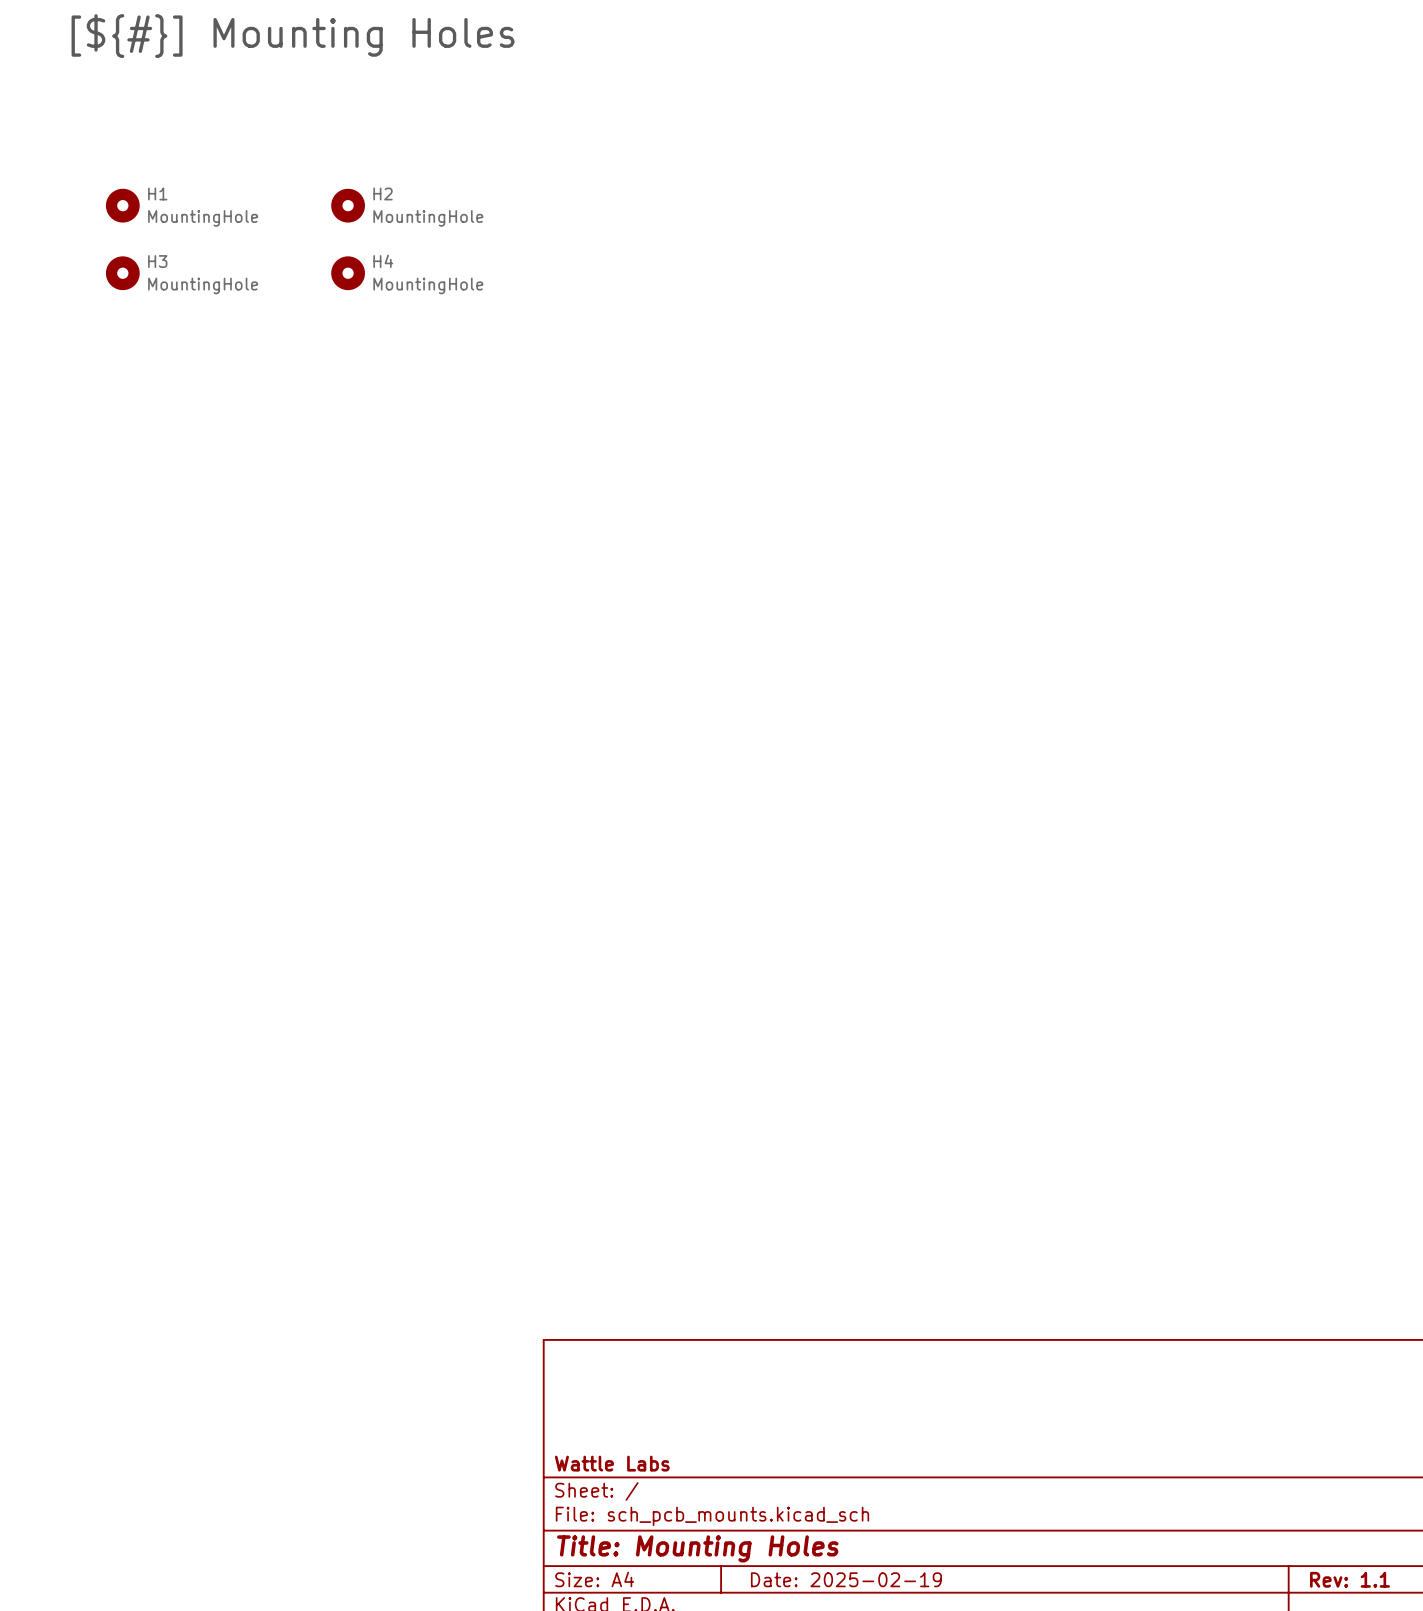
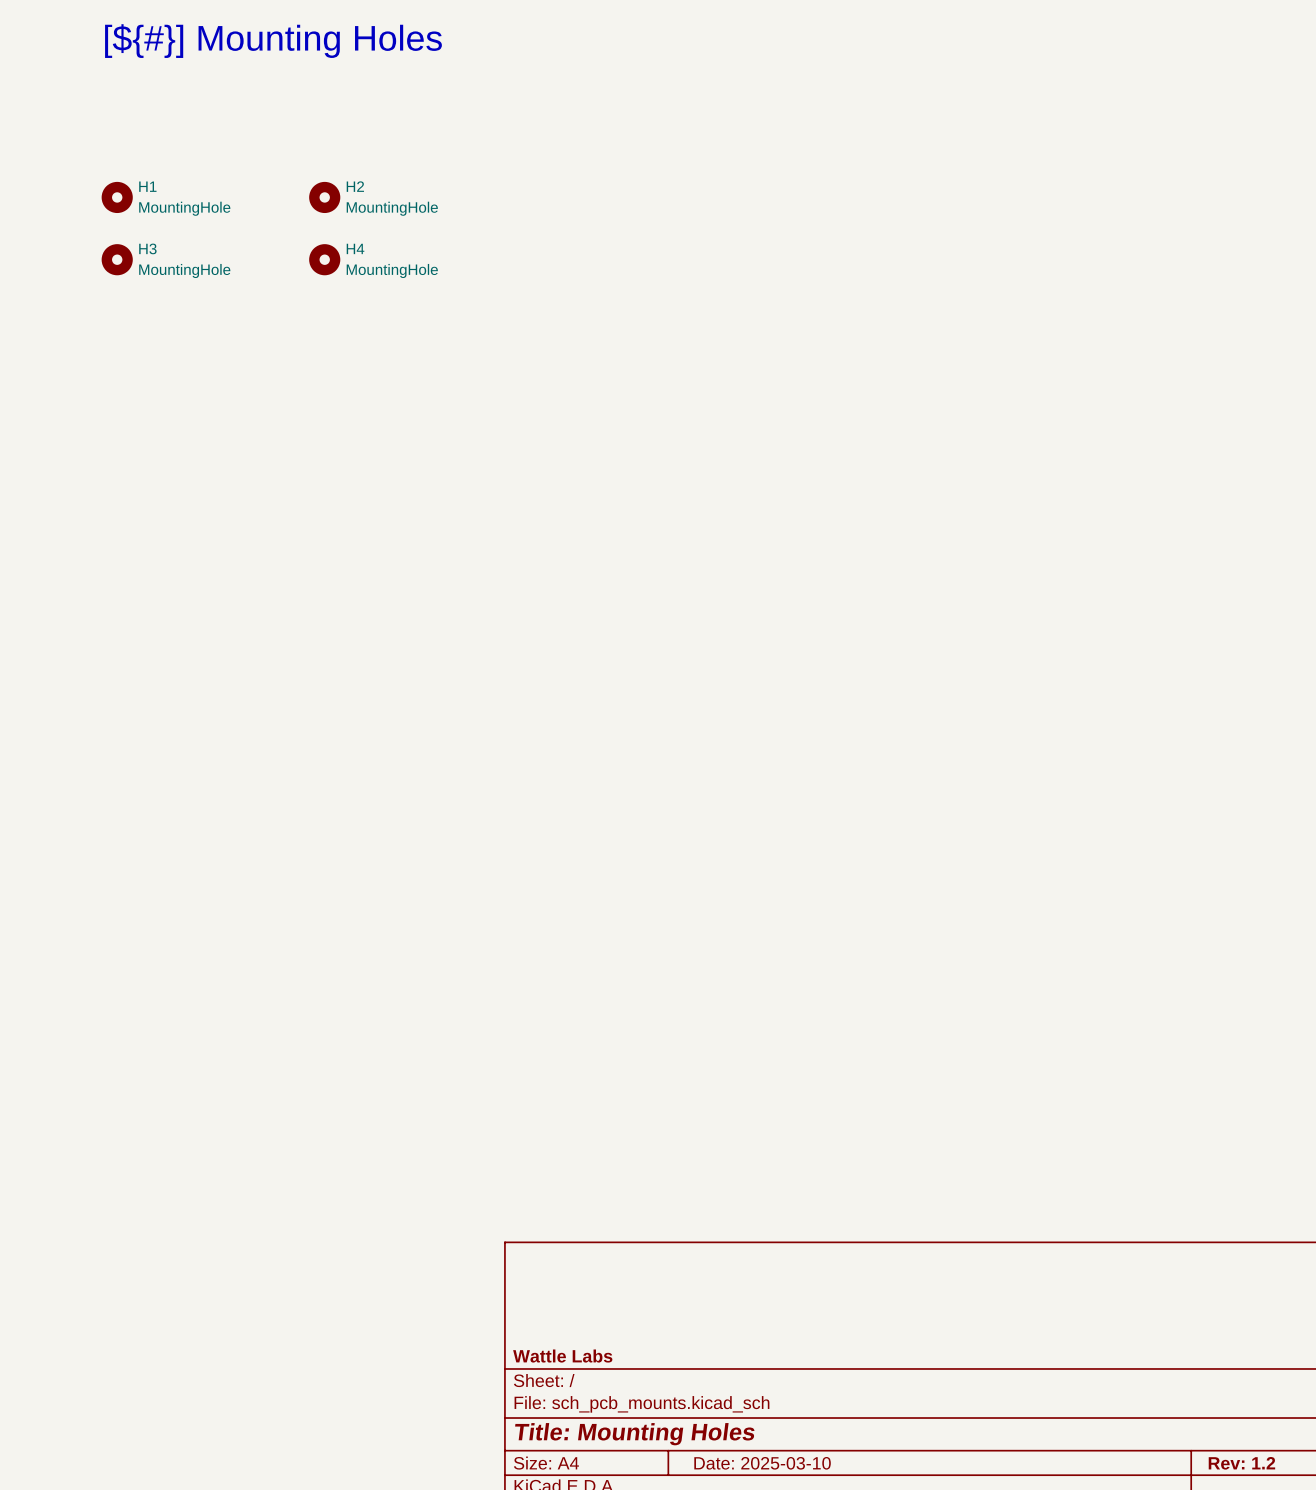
title block: Date: 2025-02-19 (846, 1579) -> Date: 2025-03-10 (762, 1463)
title block: Rev: 1.1 (1349, 1579) -> Rev: 1.2 (1241, 1463)

